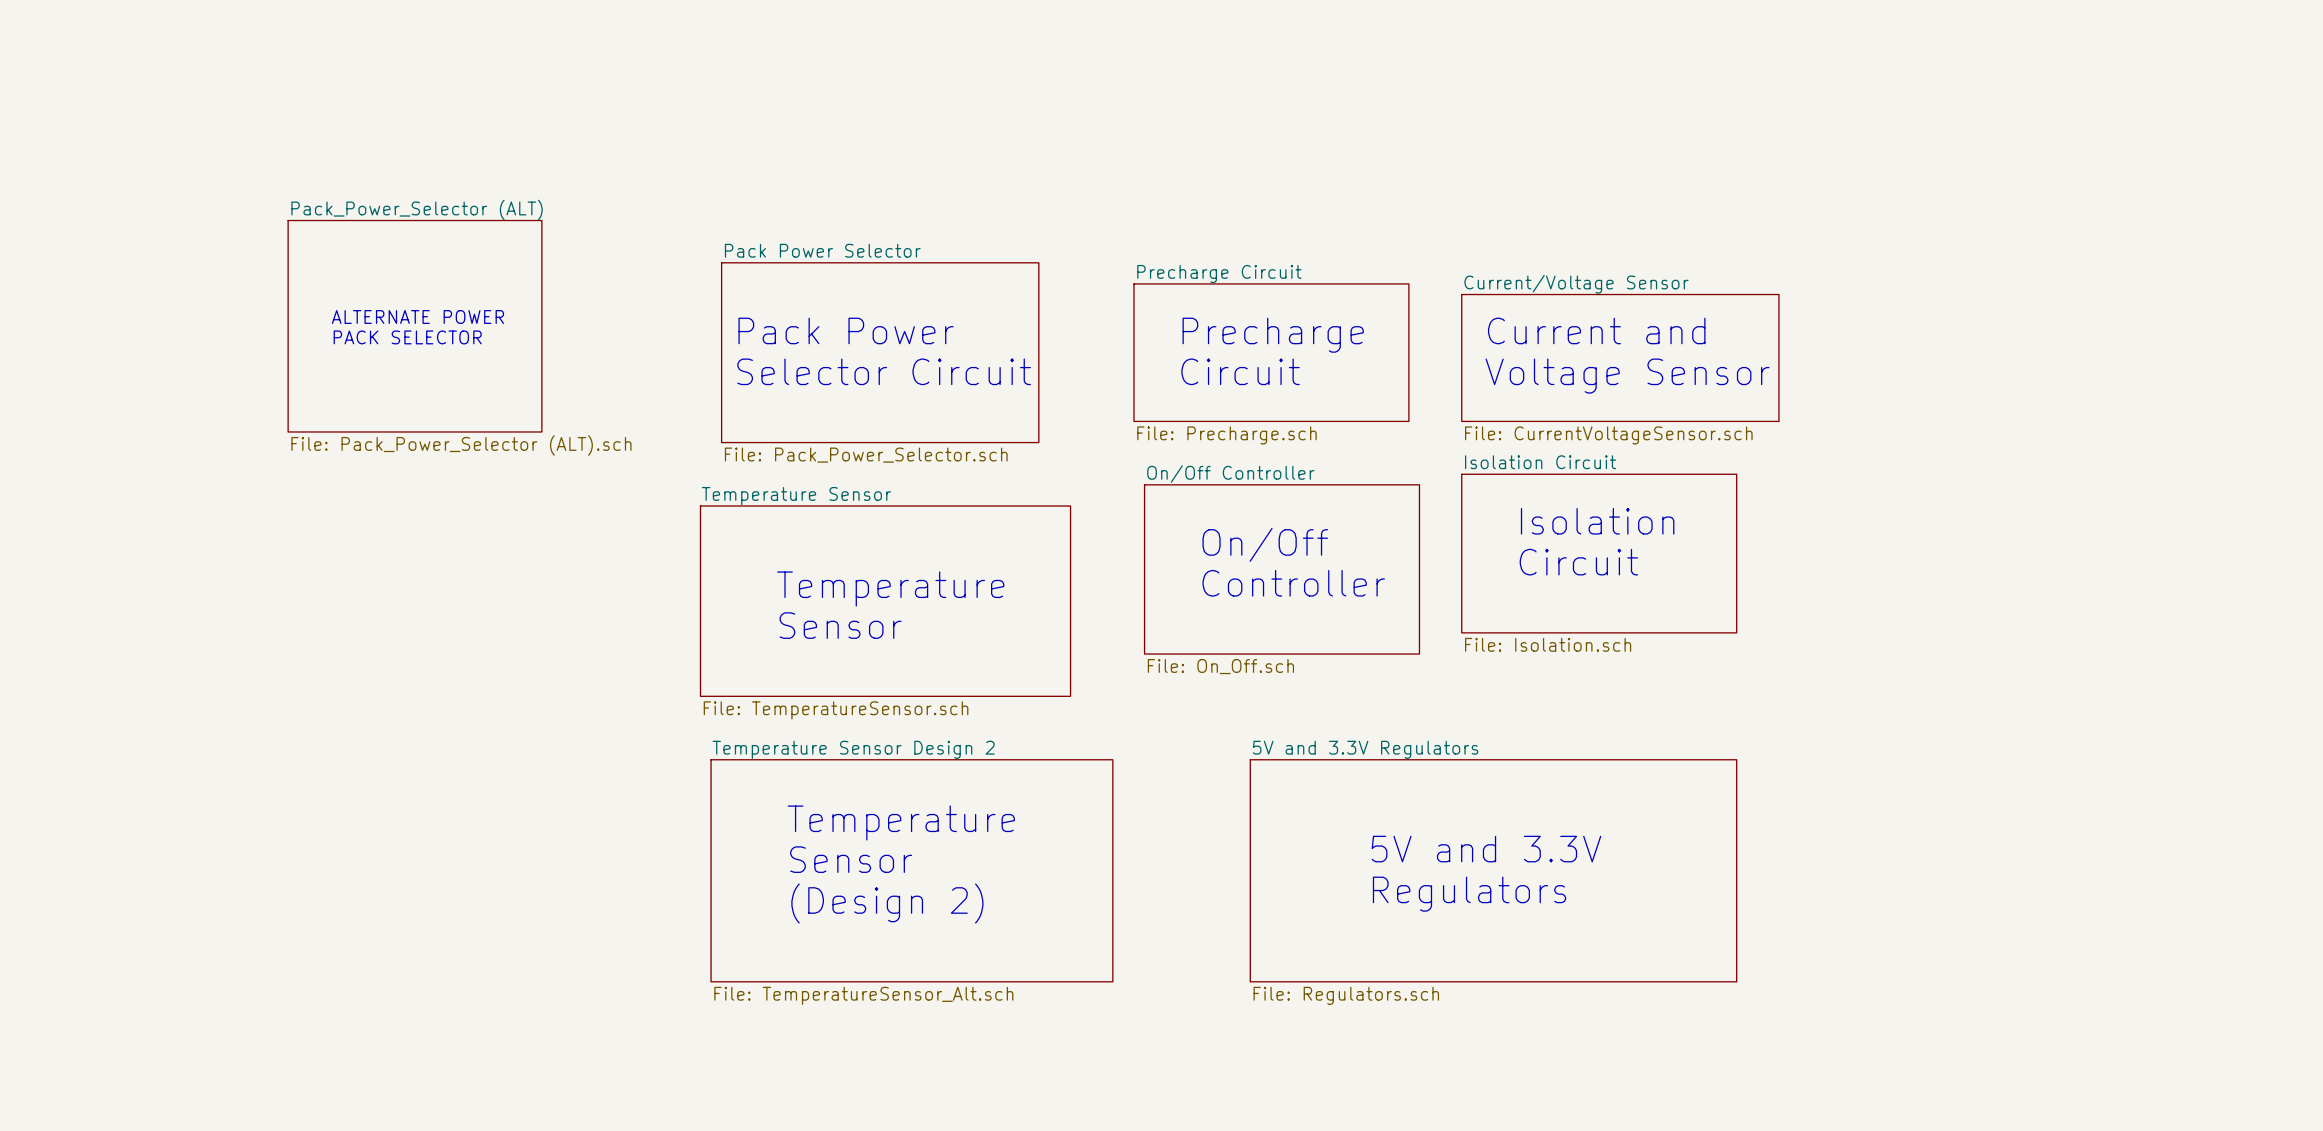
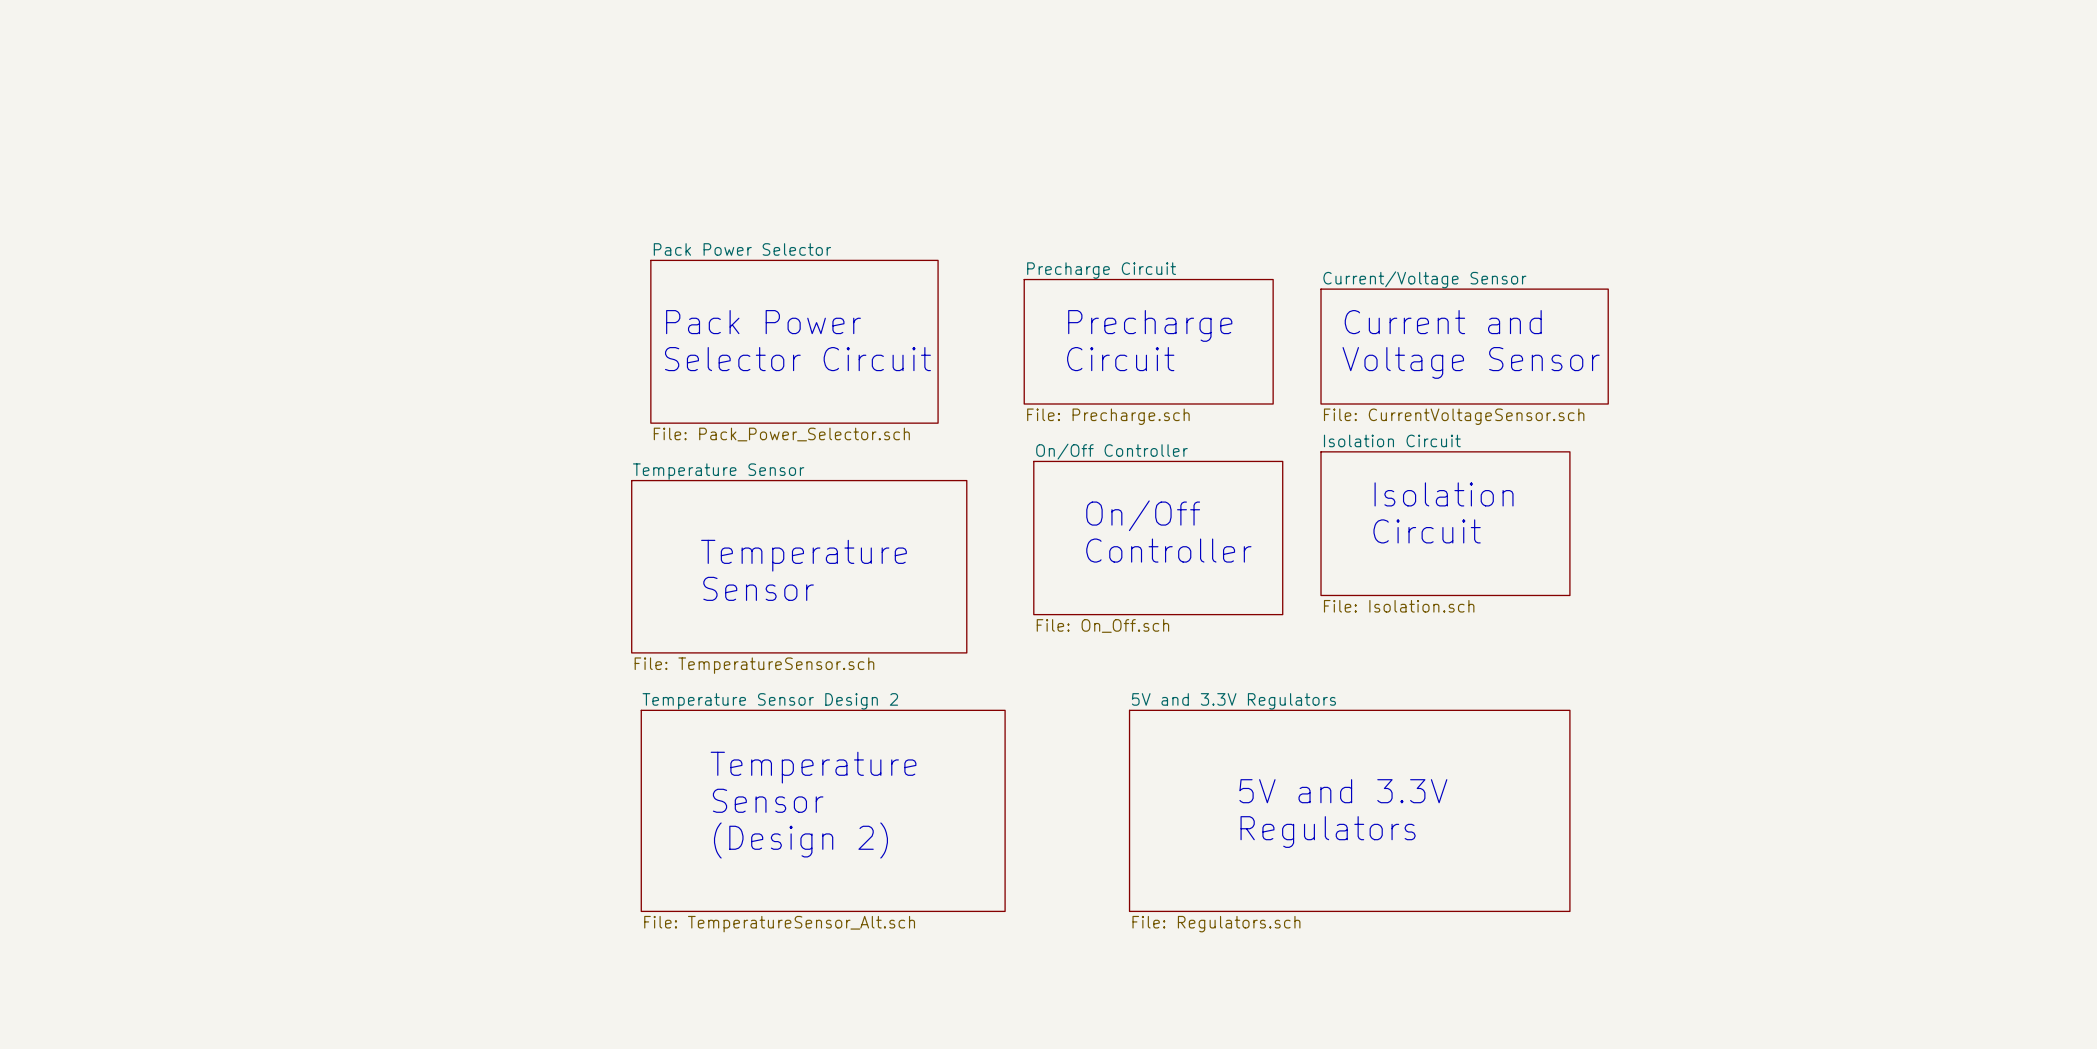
text: ALTERNATE POWER (417, 316) -> none
sheet Pack_Power_Selector (ALT): File: Pack_Power_Selector (ALT).sch (415, 326) -> none
text: PACK SELECTOR (407, 337) -> none

